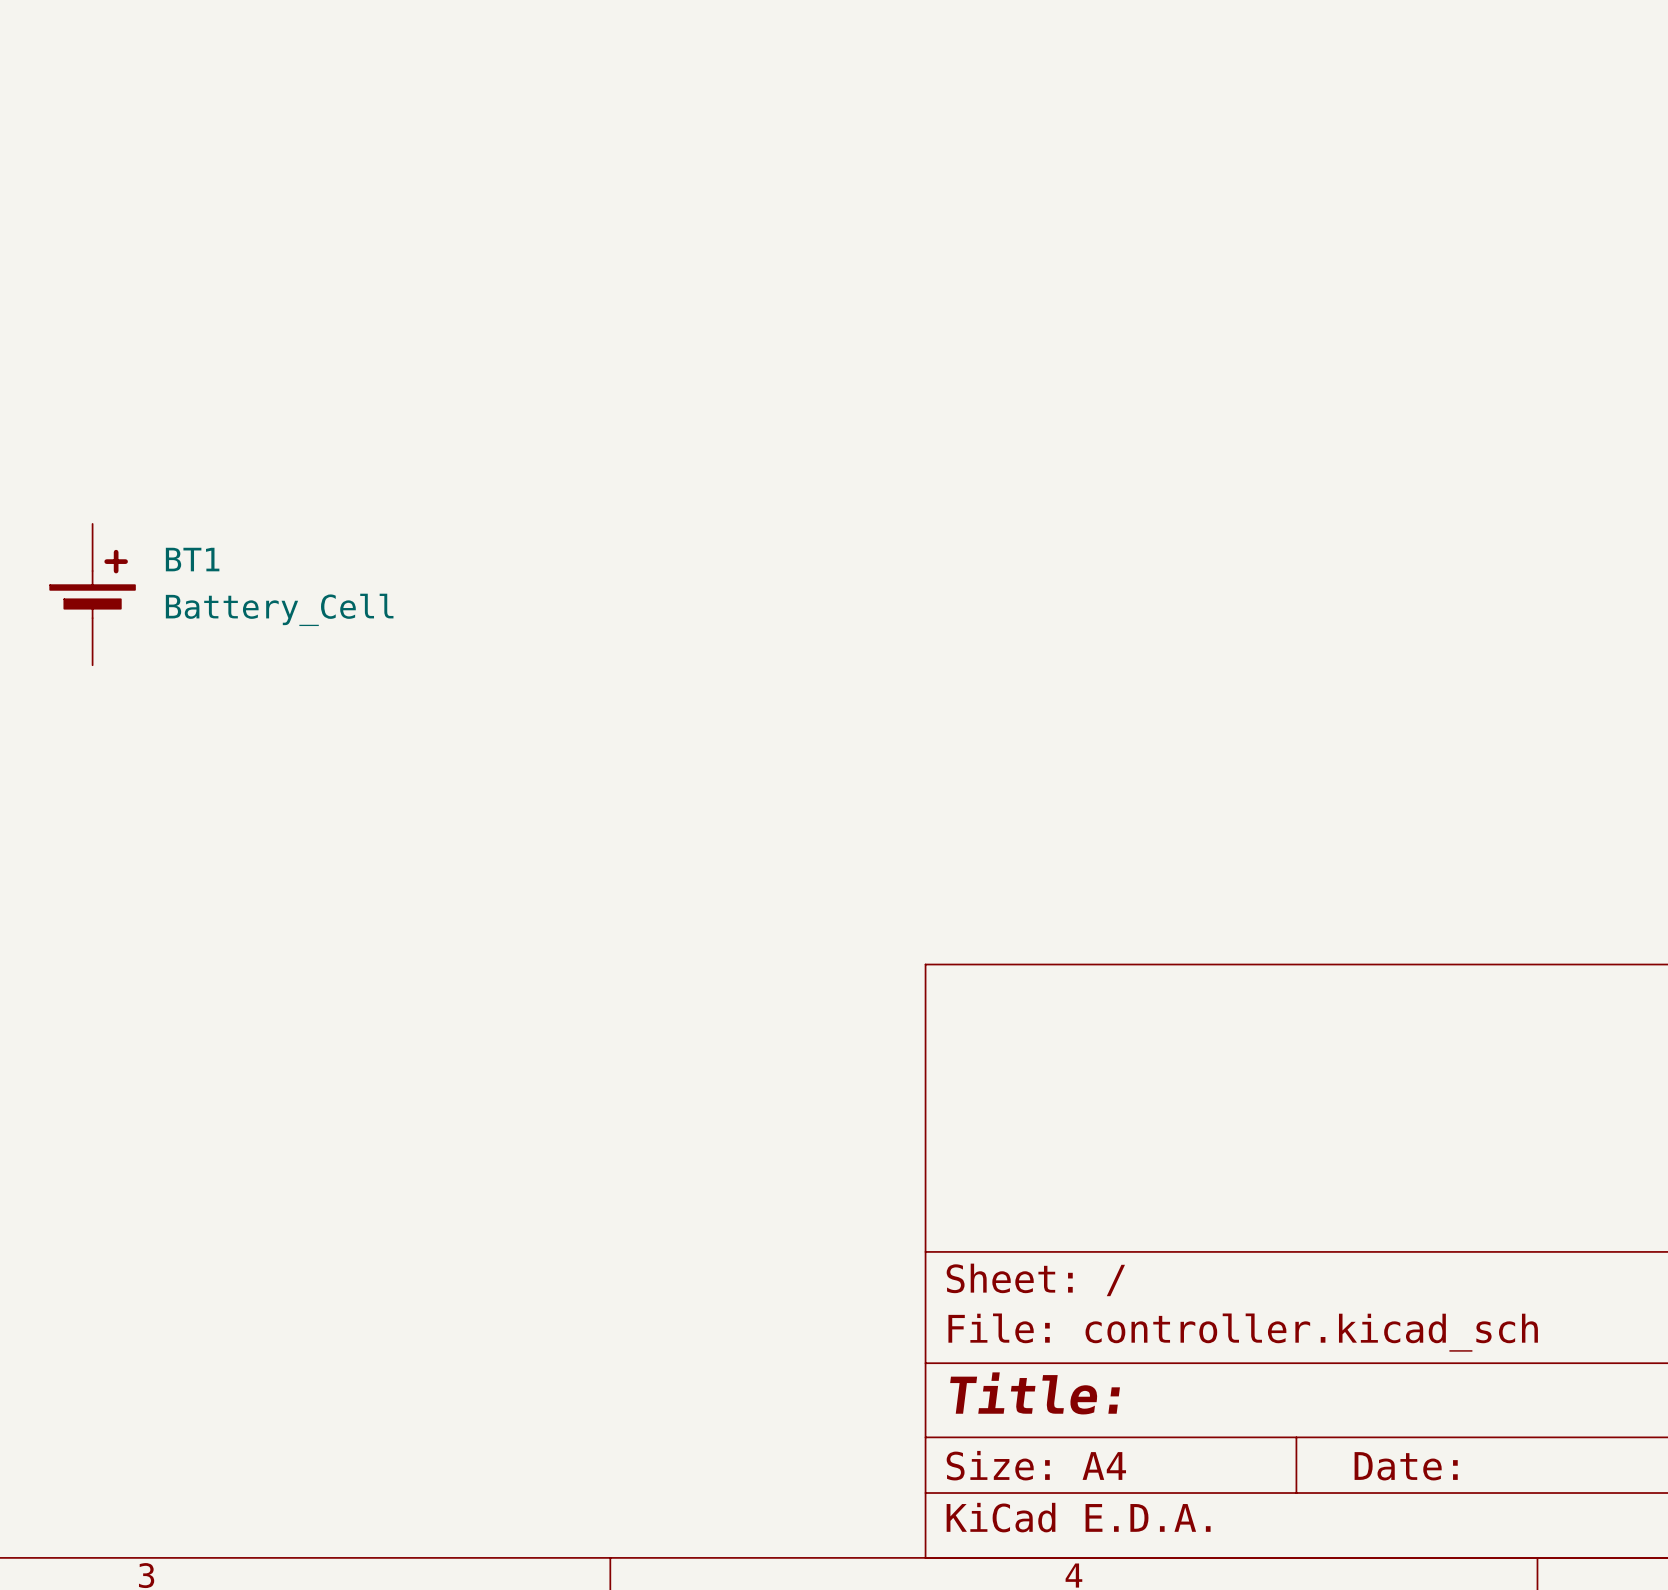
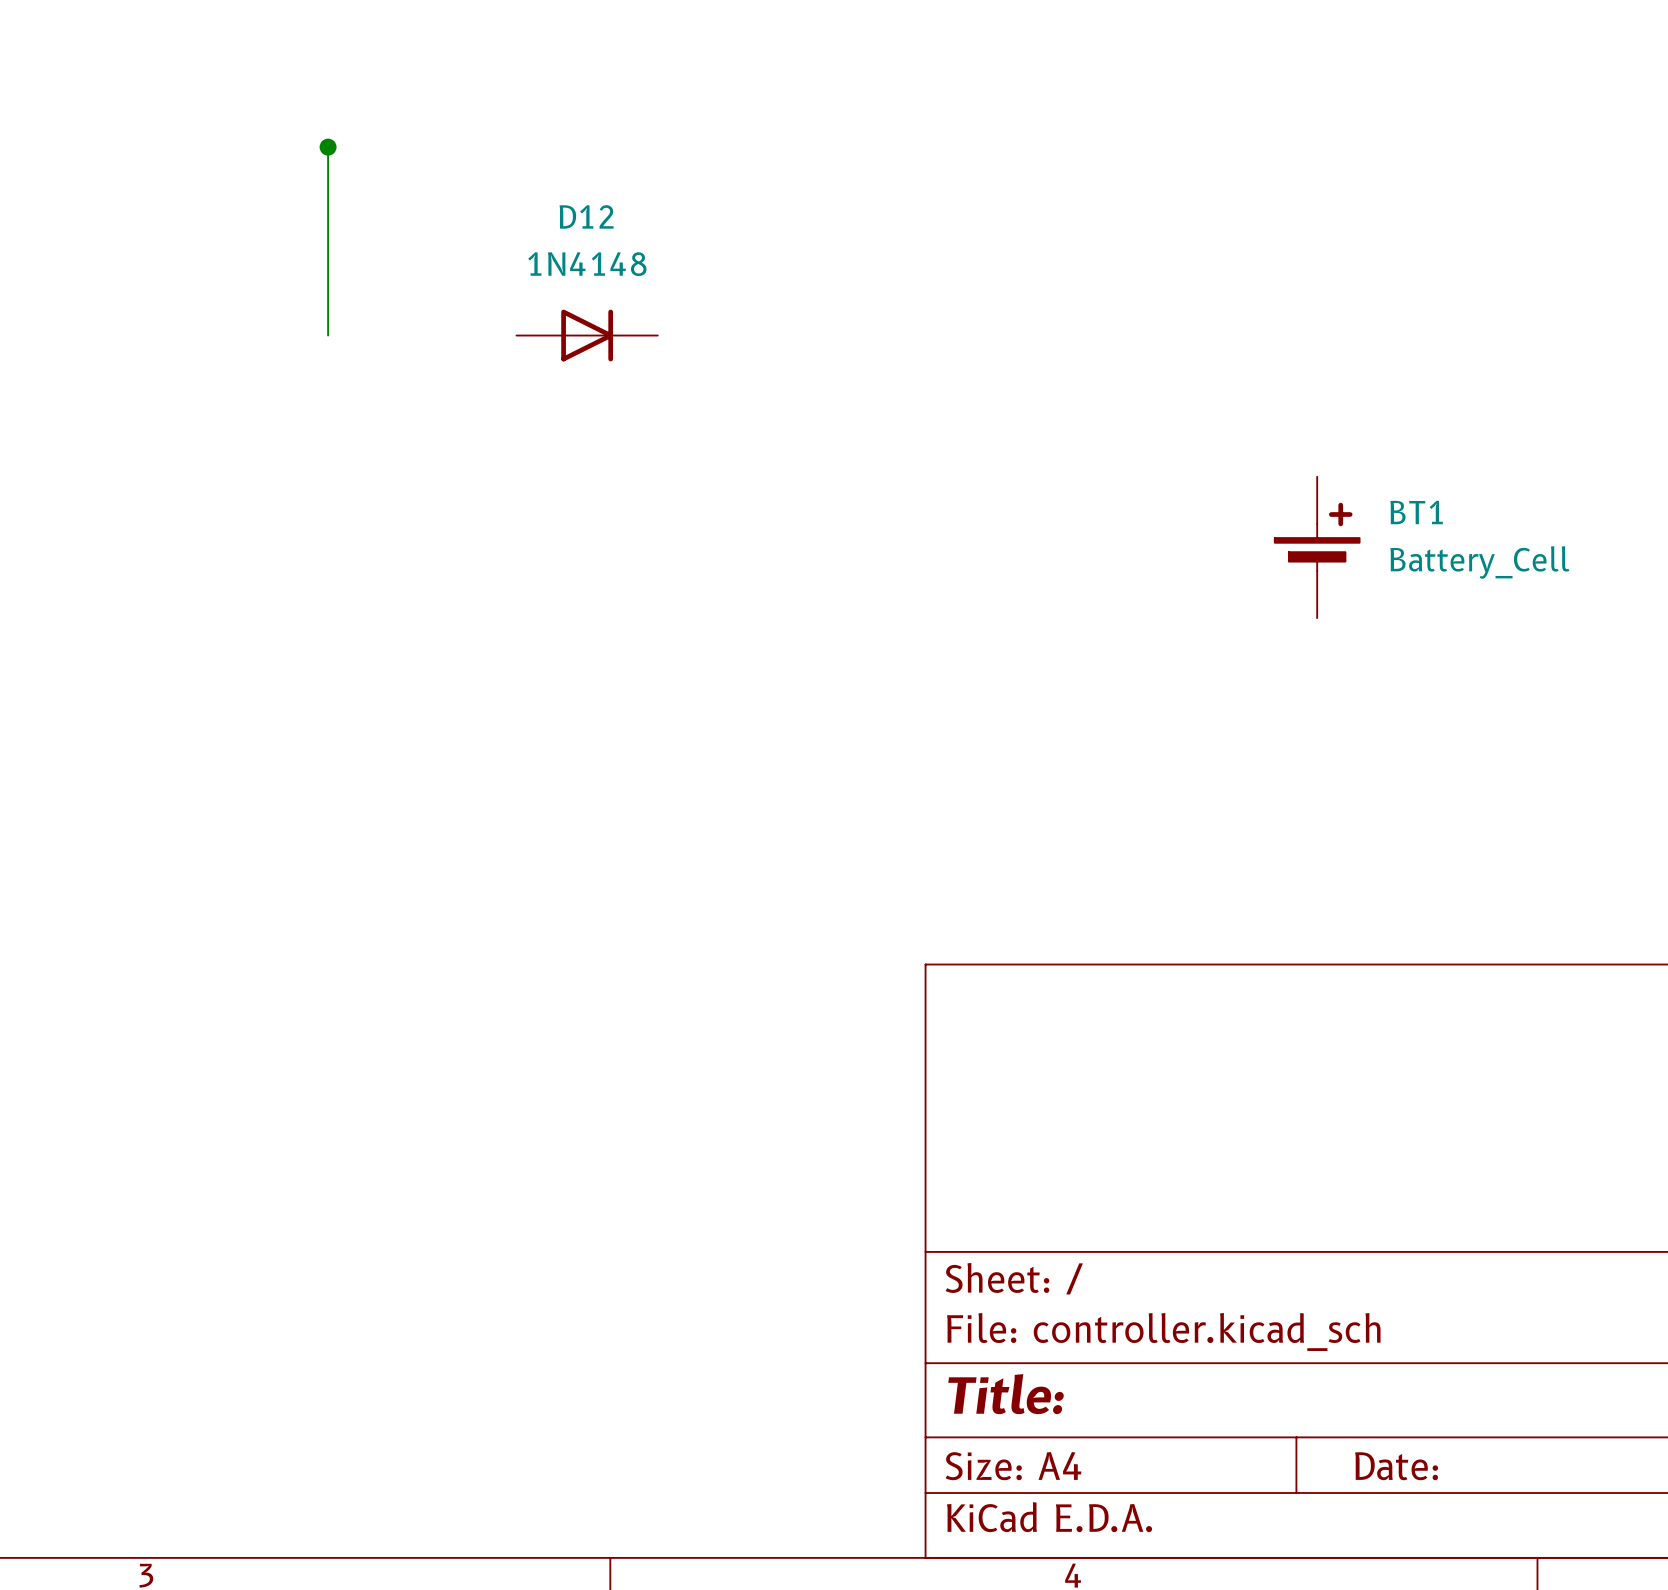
wire: none -> (328, 147) (328, 335)
junction: none -> (328, 147)
D12: none -> 1N4148 (587, 335)
BT1 position: (92, 594) -> (1317, 547)

